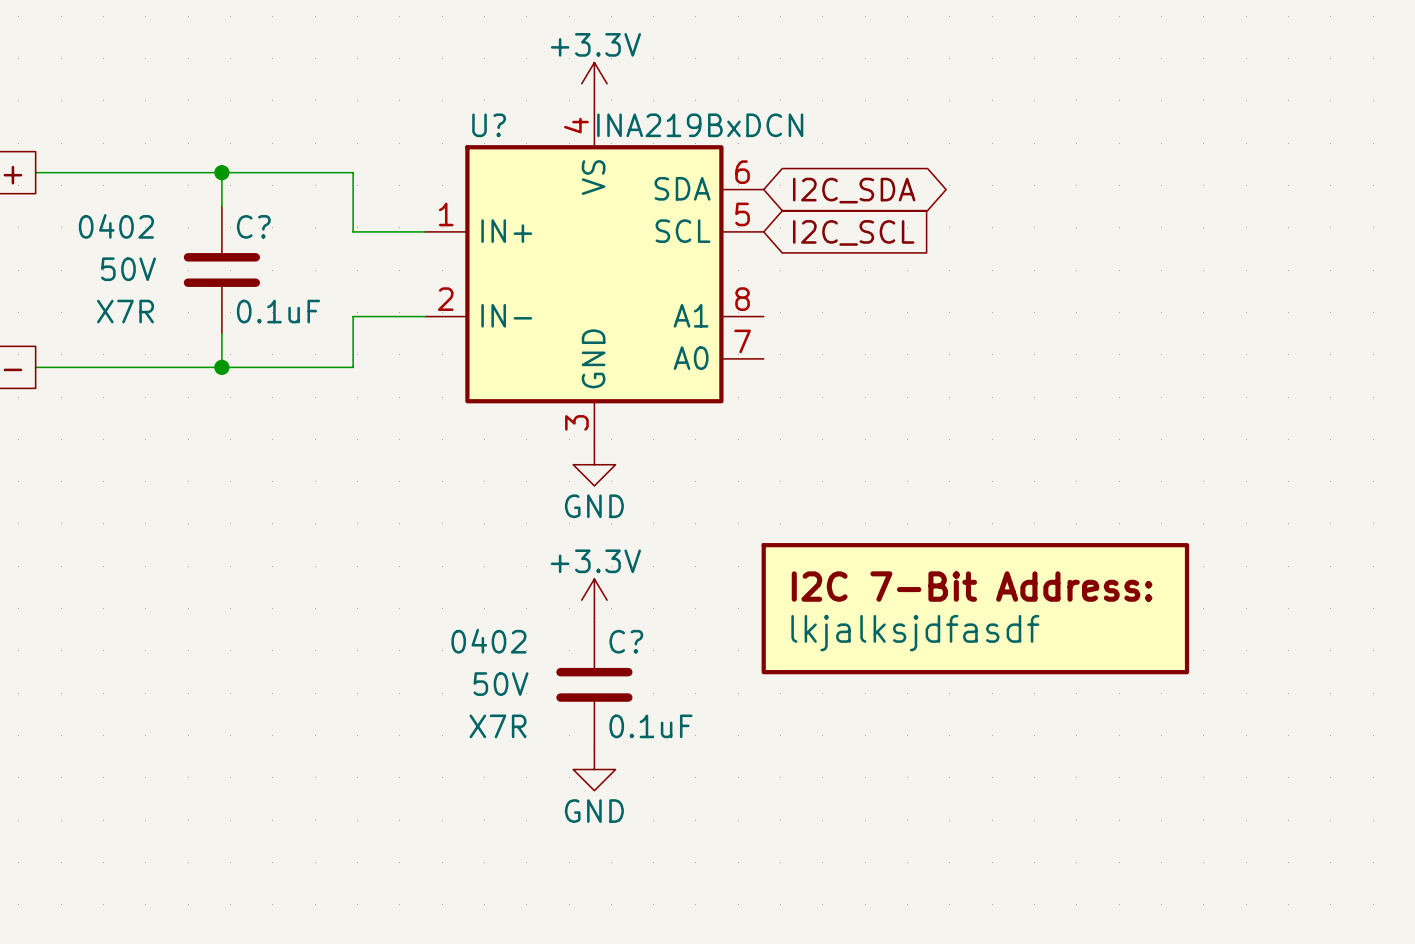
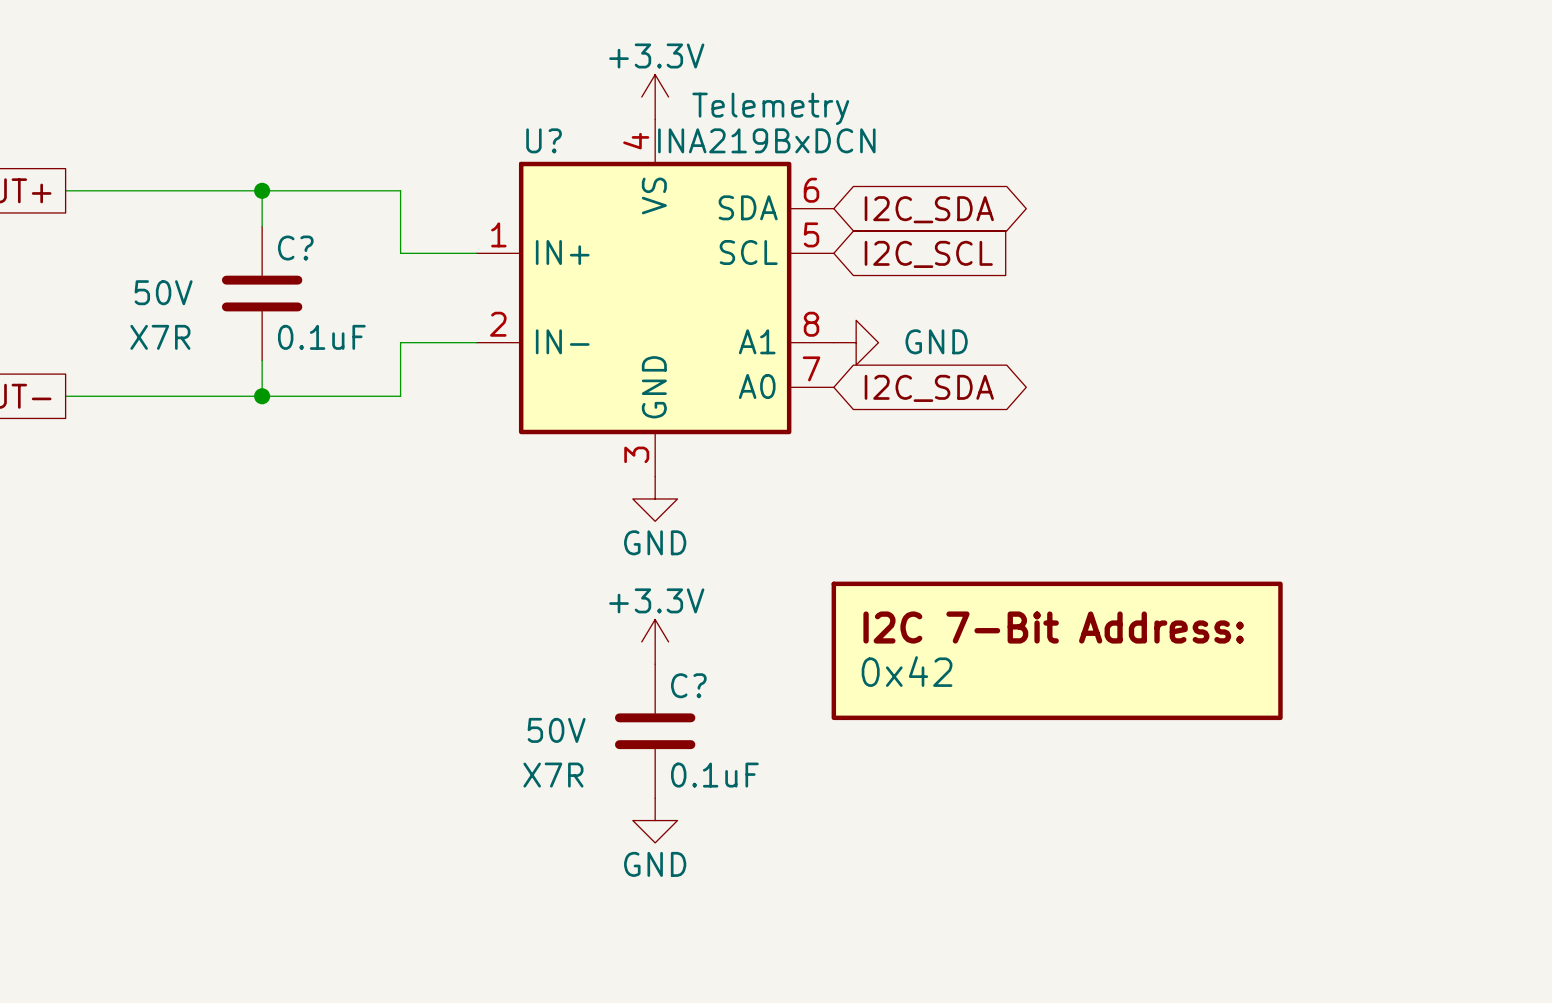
U? text: none -> Telemetry (770, 108)
C? text: 0402 (116, 226) -> none
power symbol: none -> GND (856, 342)
global label: none -> I2C_SDA (929, 388)
part value: lkjalksjdfasdf (915, 633) -> 0x42 (907, 671)
C? text: 0402 (488, 641) -> none

